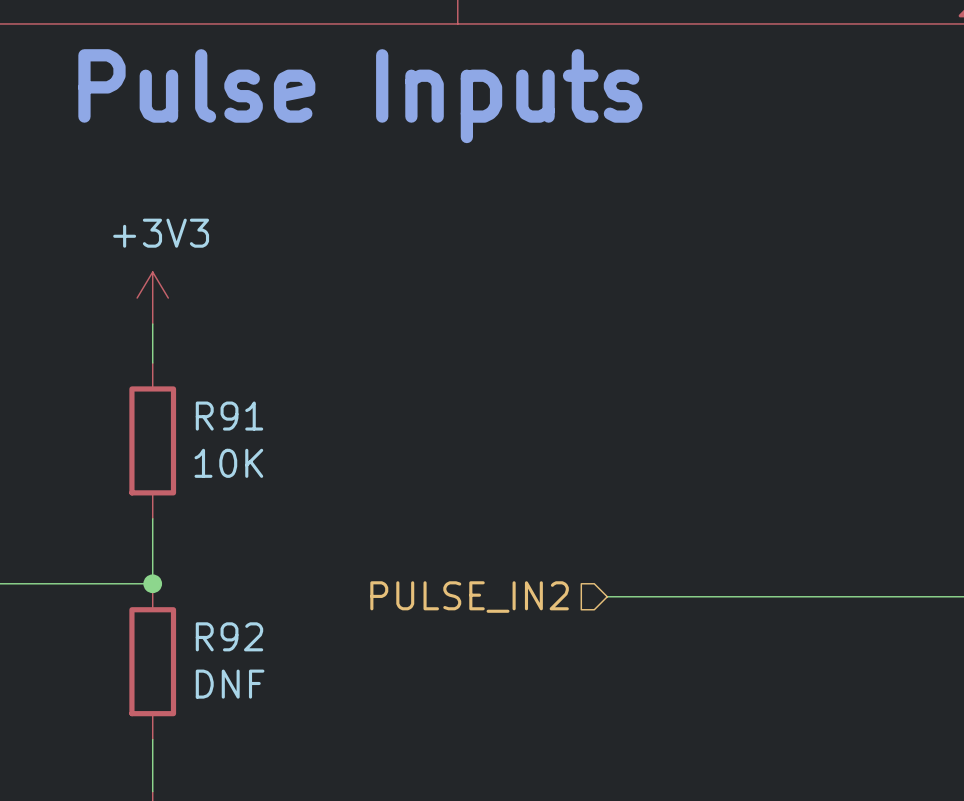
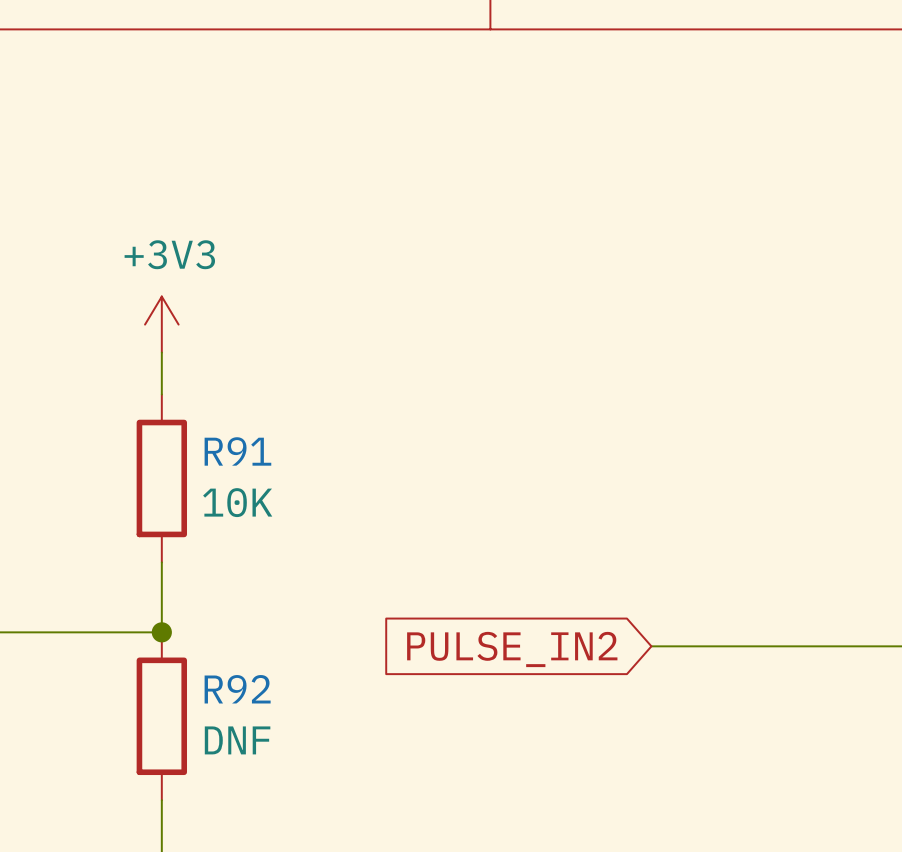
text: Pulse Inputs (360, 96) -> none
hierarchical label: PULSE_IN2 (469, 597) -> none
global label: none -> PULSE_IN2 (512, 649)

